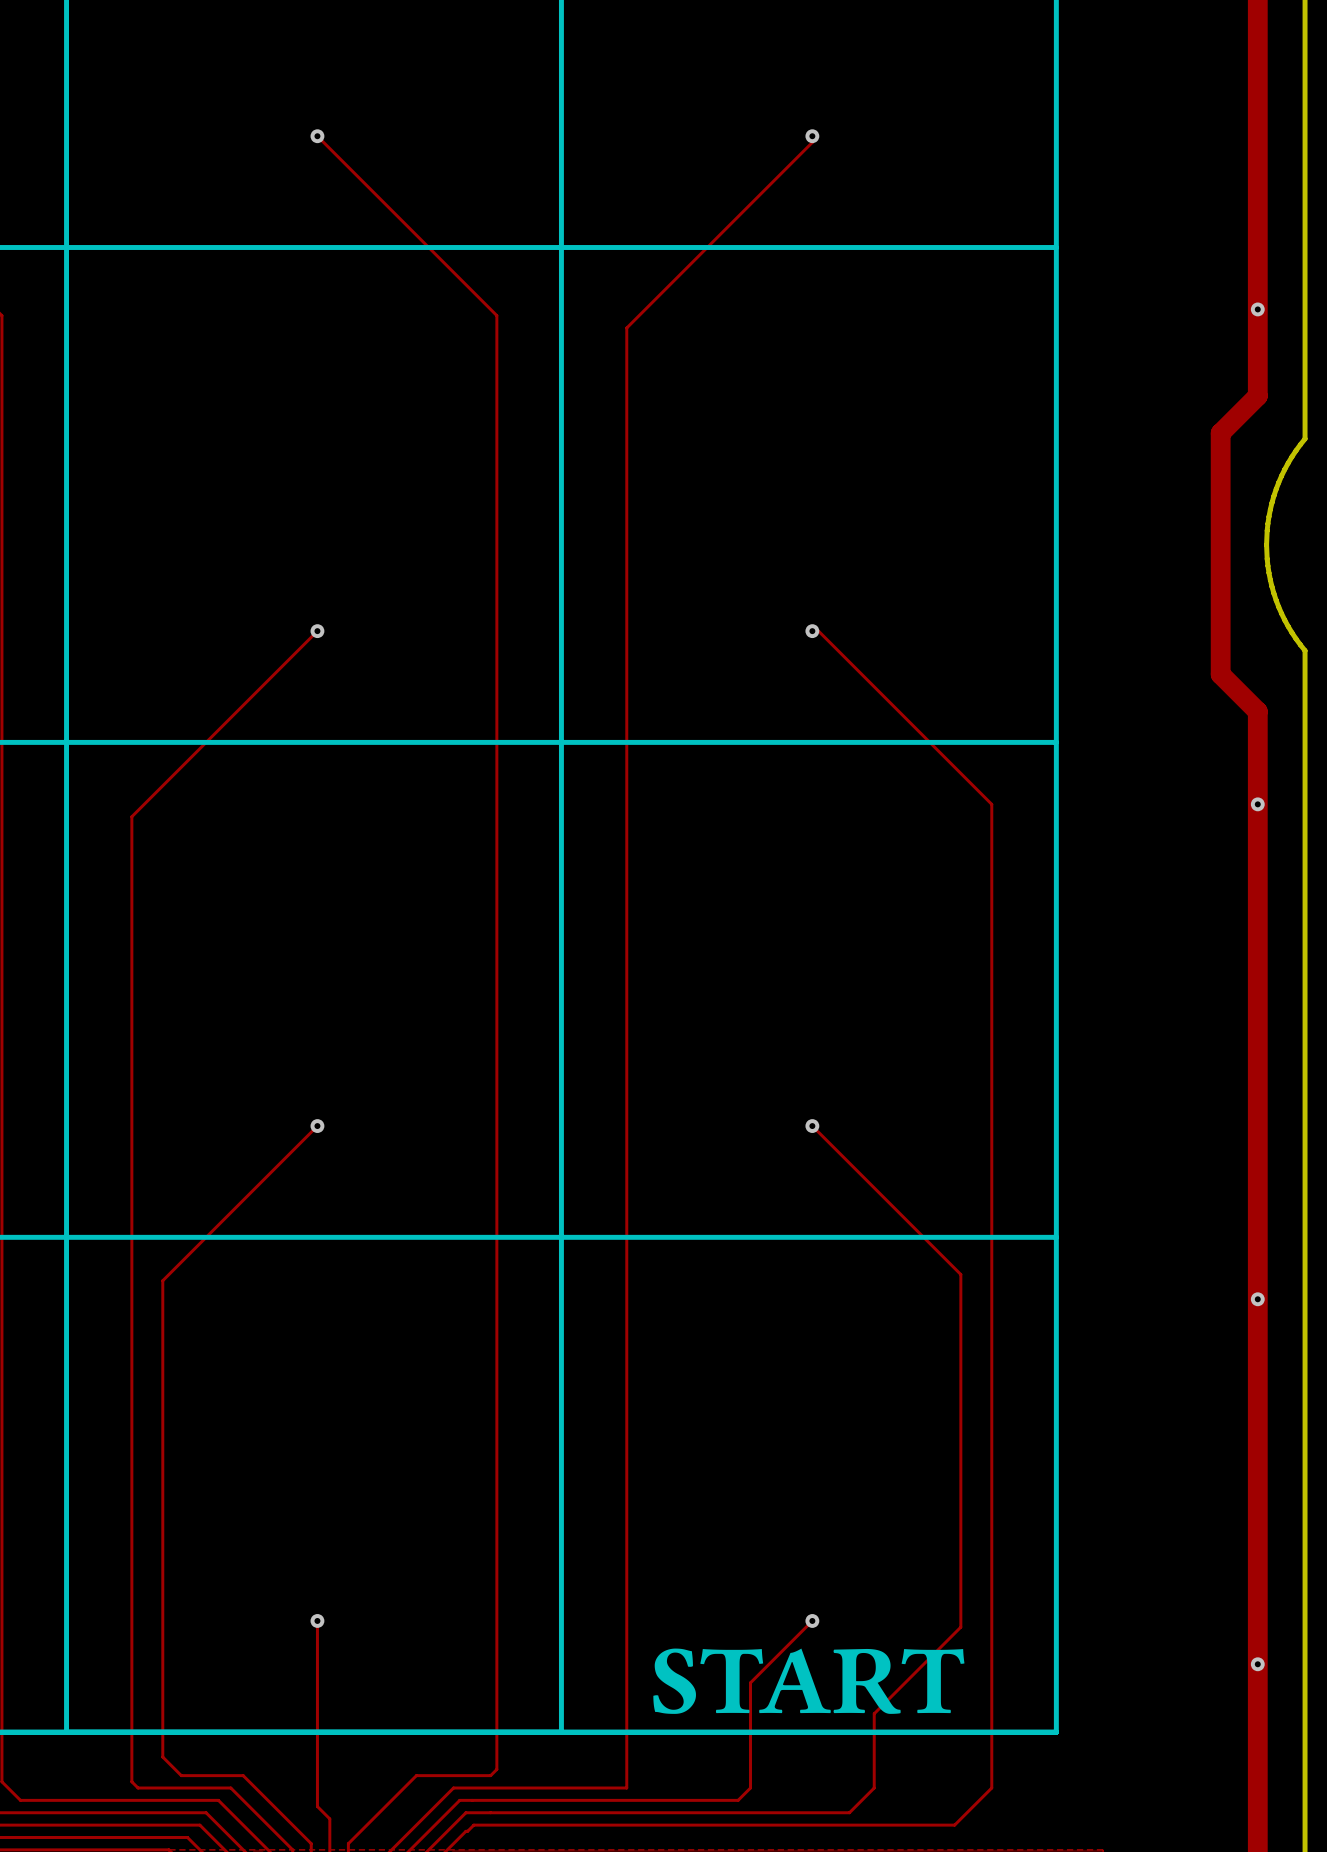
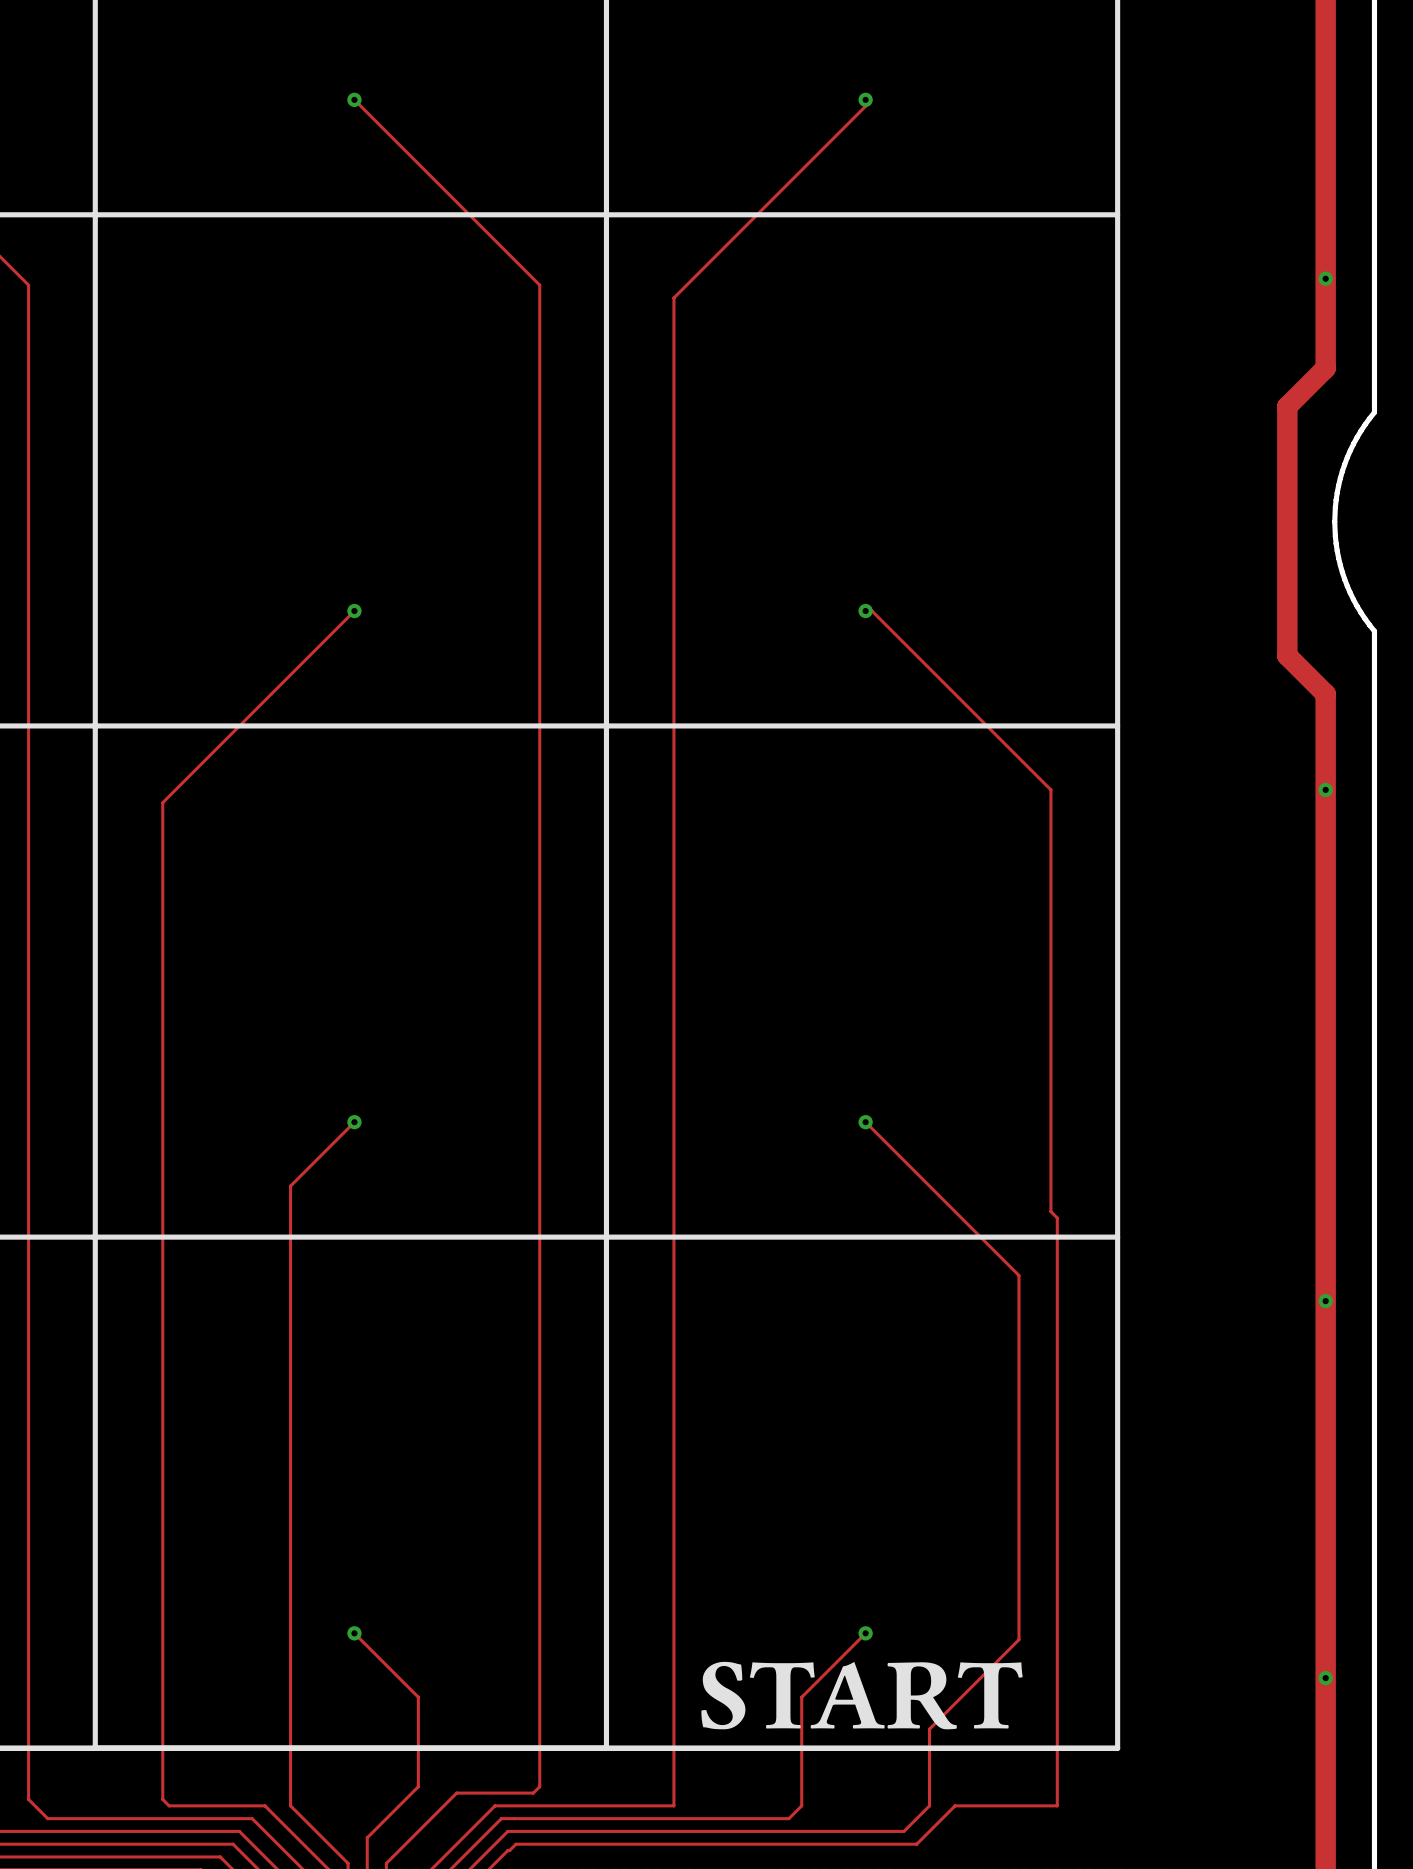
track: (255, 1187) (162, 1280) (162, 1757) (181, 1775) (243, 1775) (255, 1788) -> (290, 1186) (290, 1805)
track: (991, 1212) (991, 1788) (954, 1825) (861, 1825) -> (1050, 1211) (1057, 1218) (1057, 1805) (955, 1805) (916, 1844)
track: (317, 1620) (317, 1806) (329, 1818) -> (354, 1633) (418, 1697) (418, 1786) (367, 1837)

